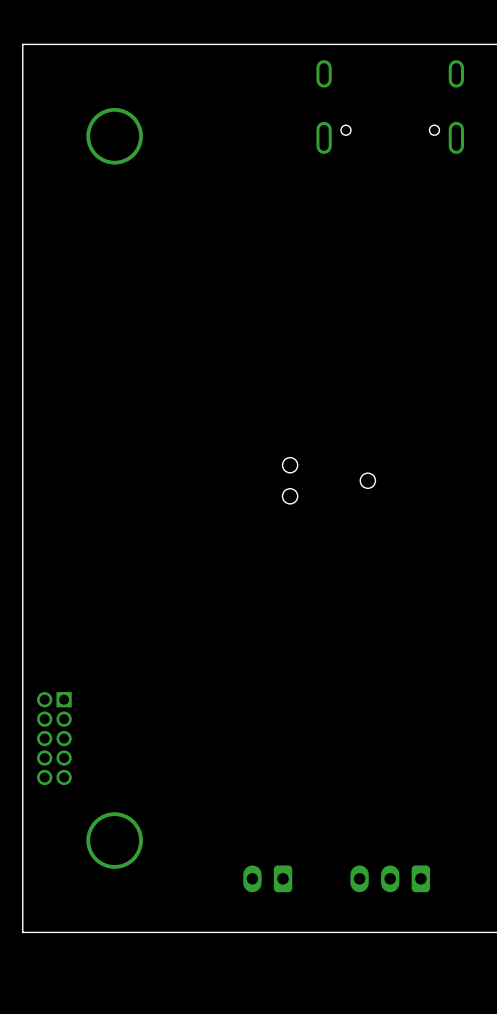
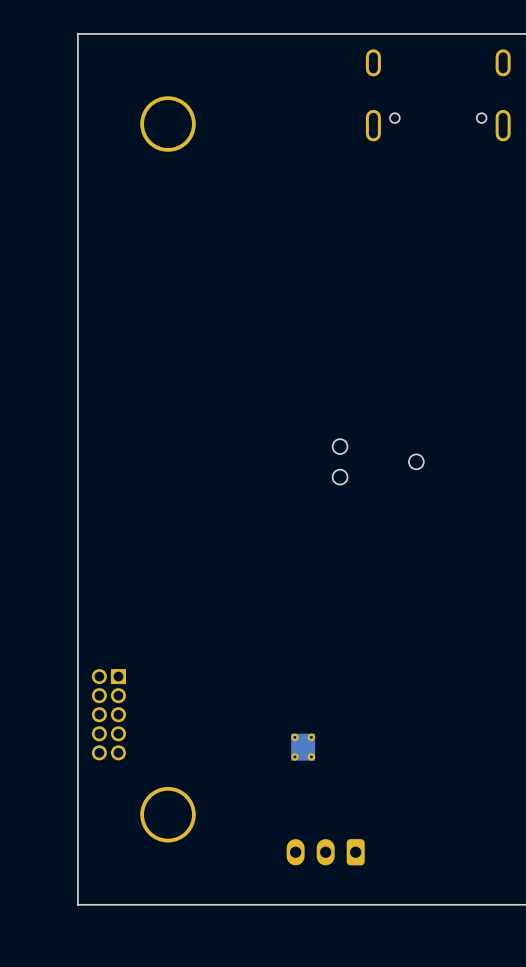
part: none -> (303, 747)
part footprint: [243, 865, 293, 893] -> [286, 839, 365, 866]
part: (390, 878) -> none

